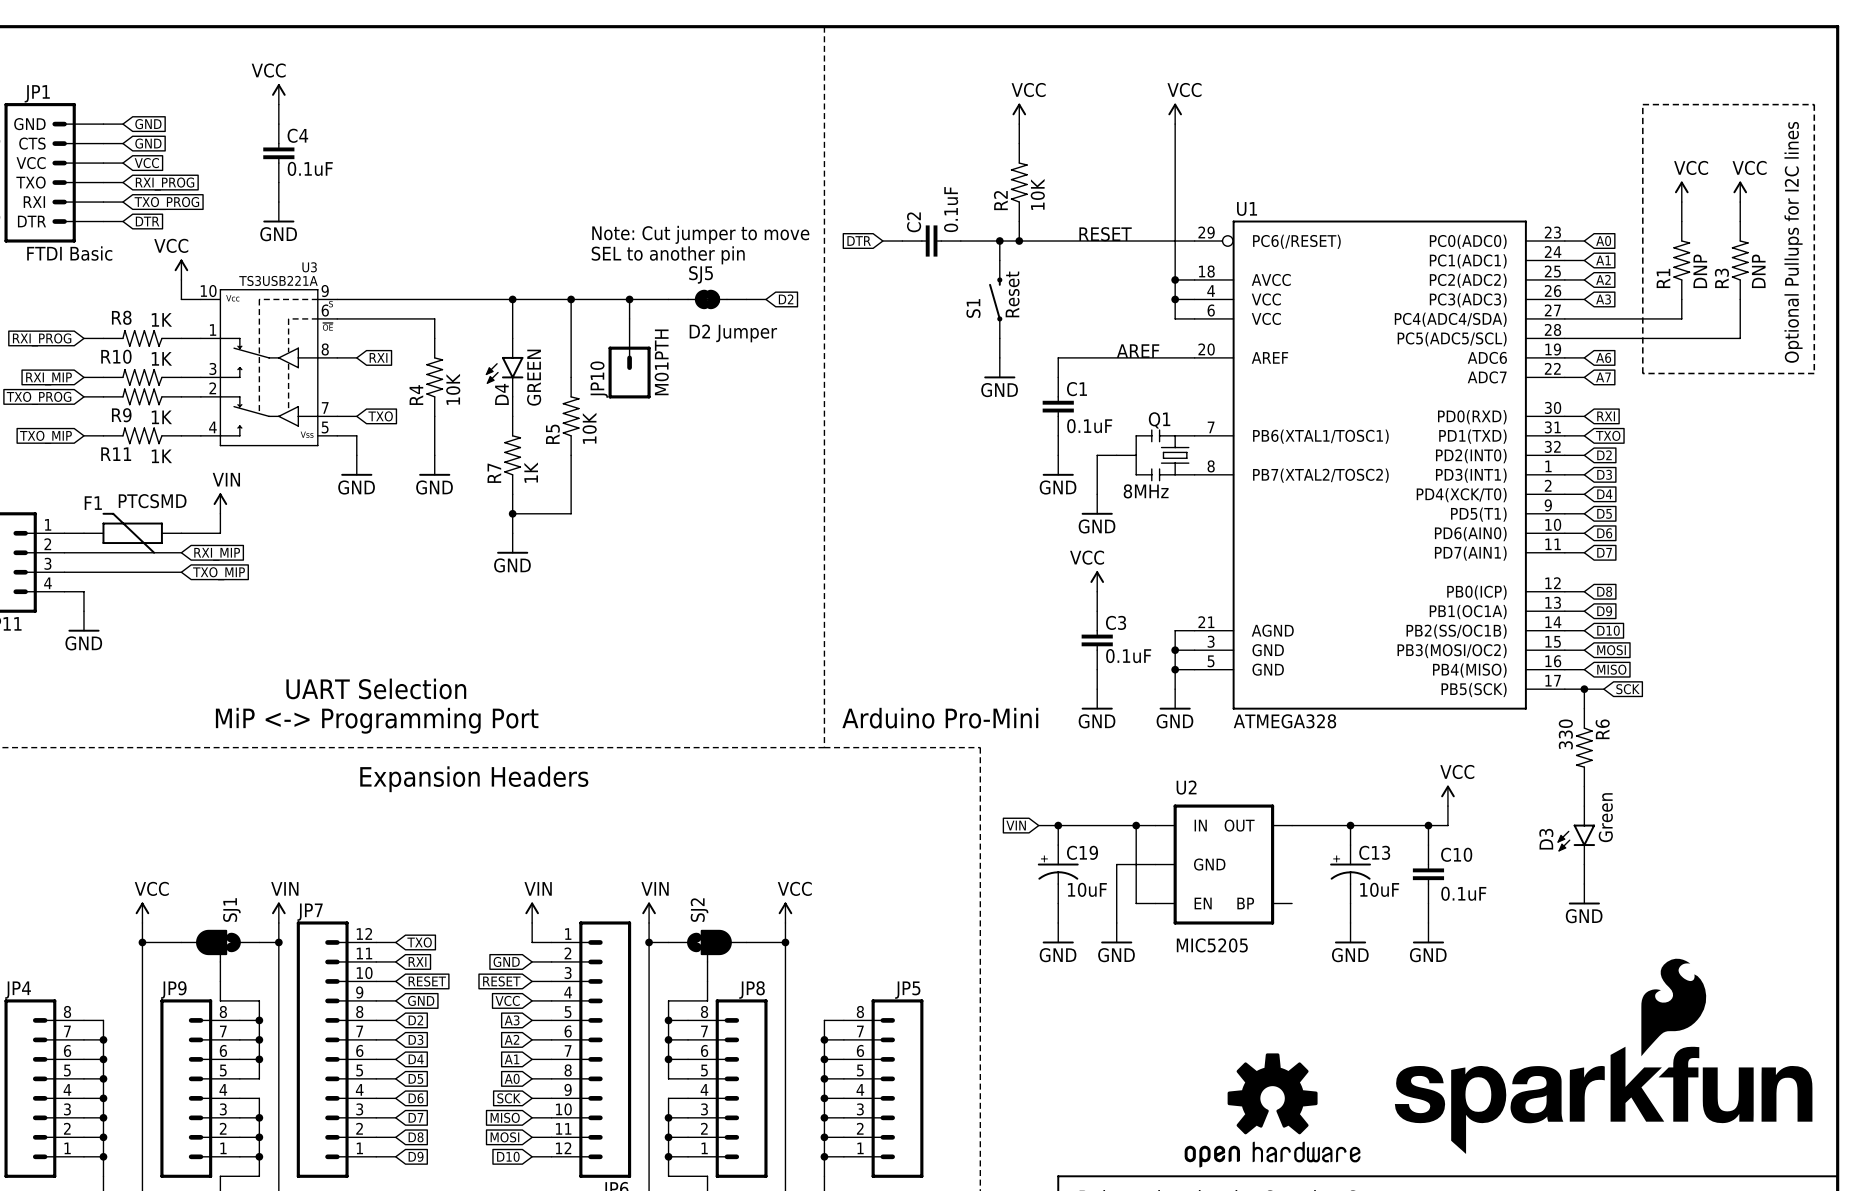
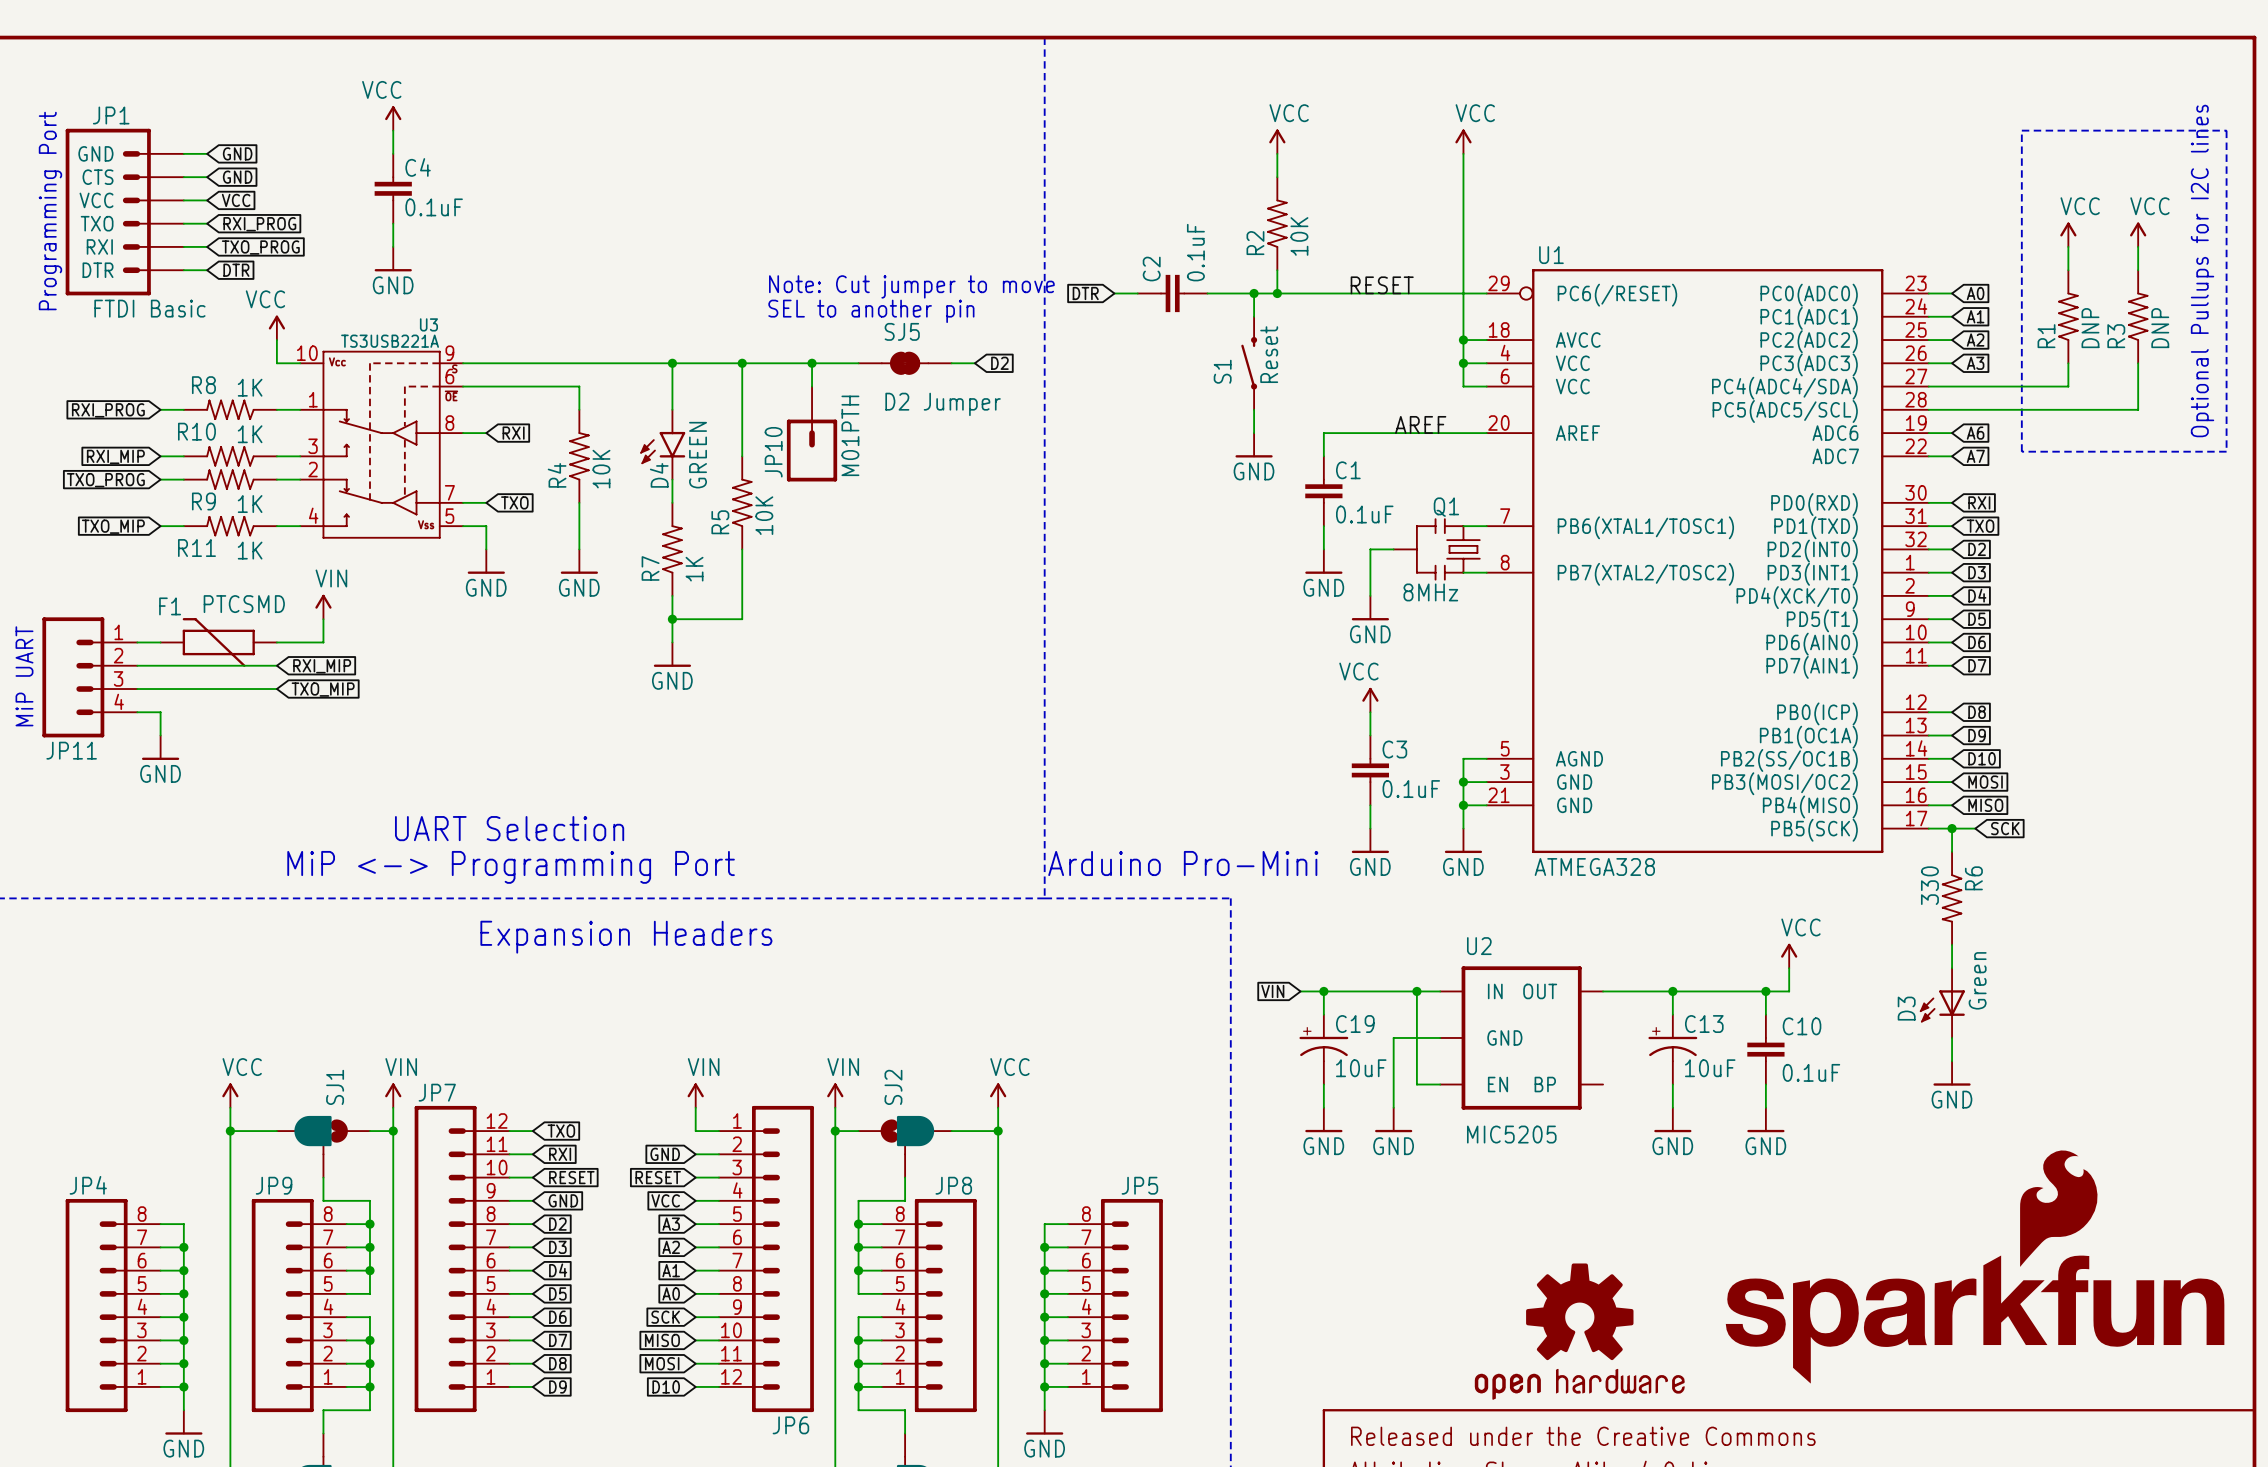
U1 pin number: 21 (1206, 622) -> 5 (1505, 748)
U1 pin number: 5 (1211, 661) -> 21 (1498, 795)
D3 symbol: [1557, 806, 1596, 865] -> [1919, 968, 1965, 1038]

